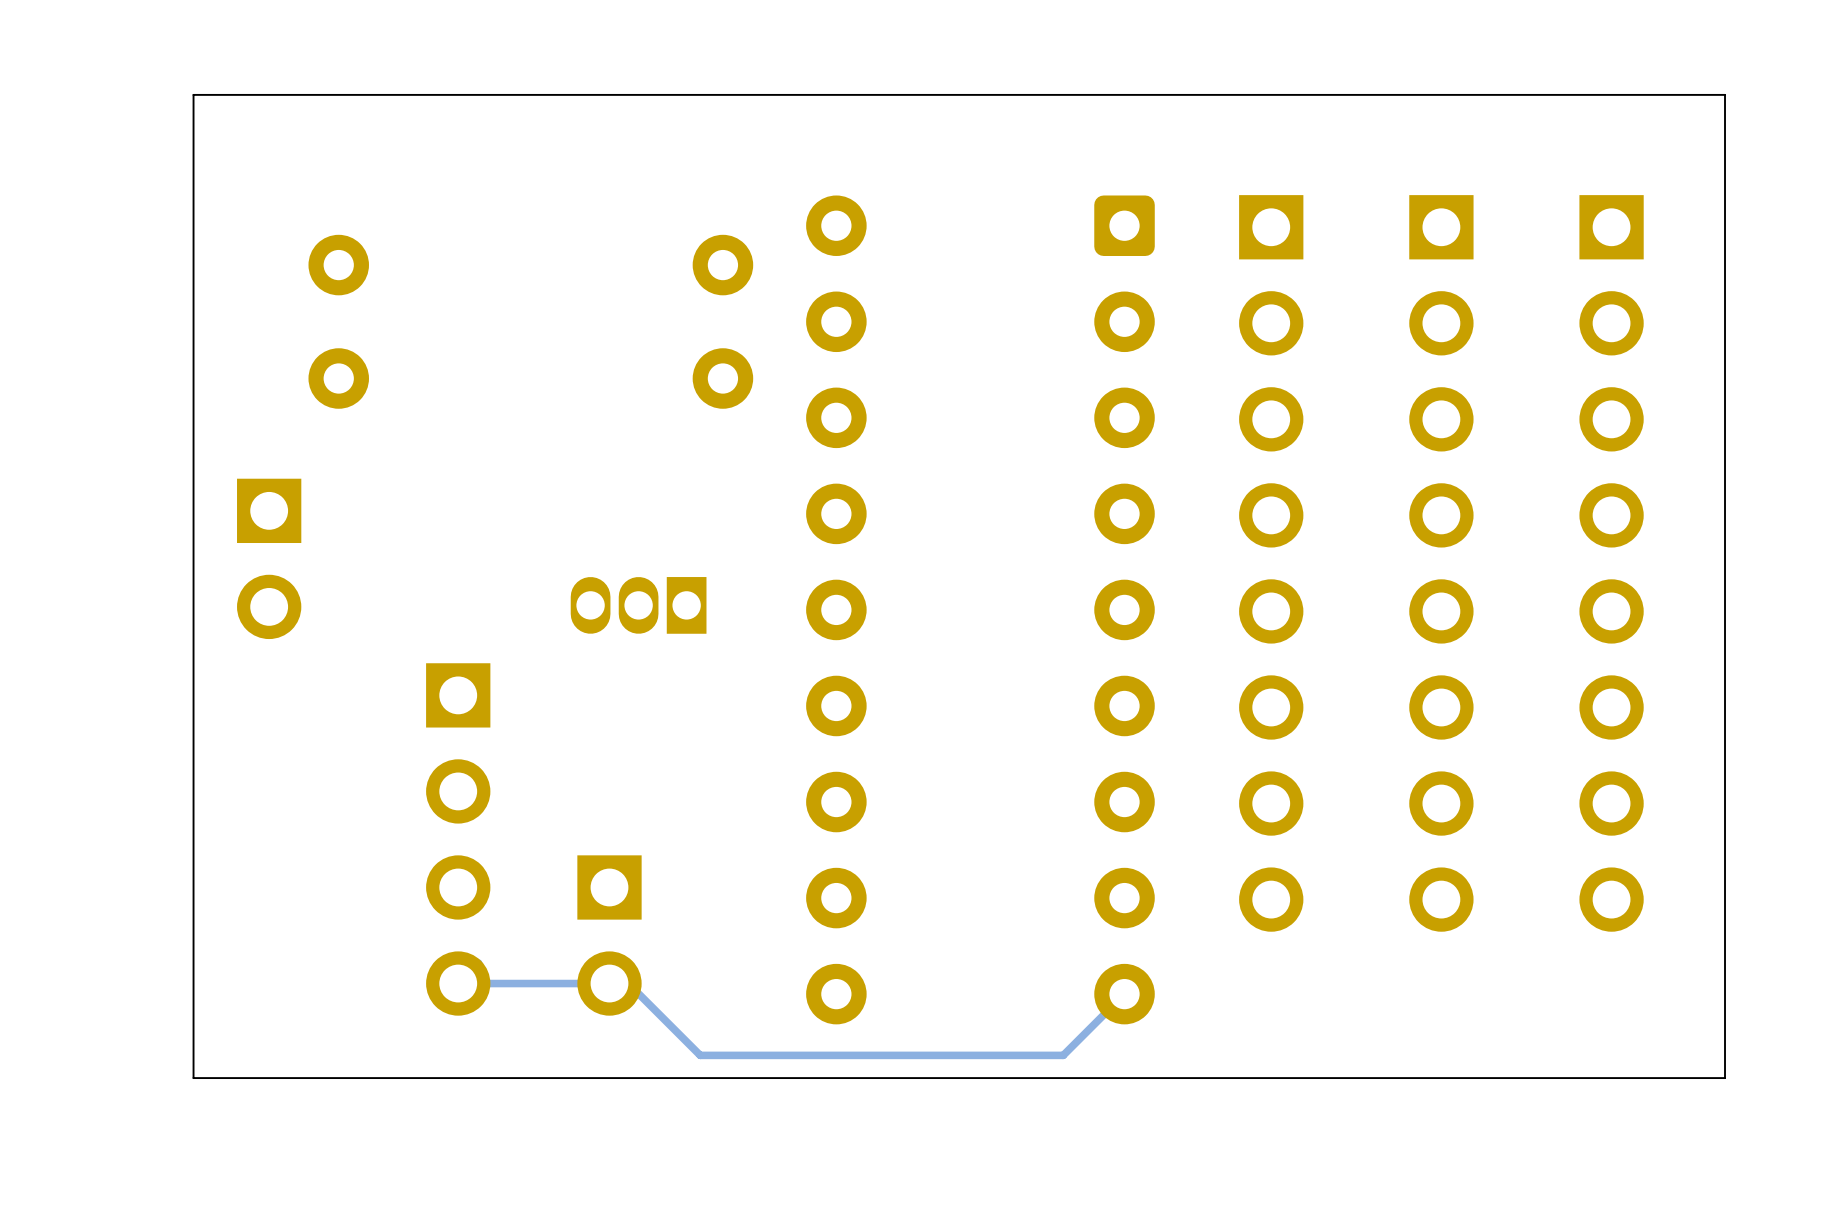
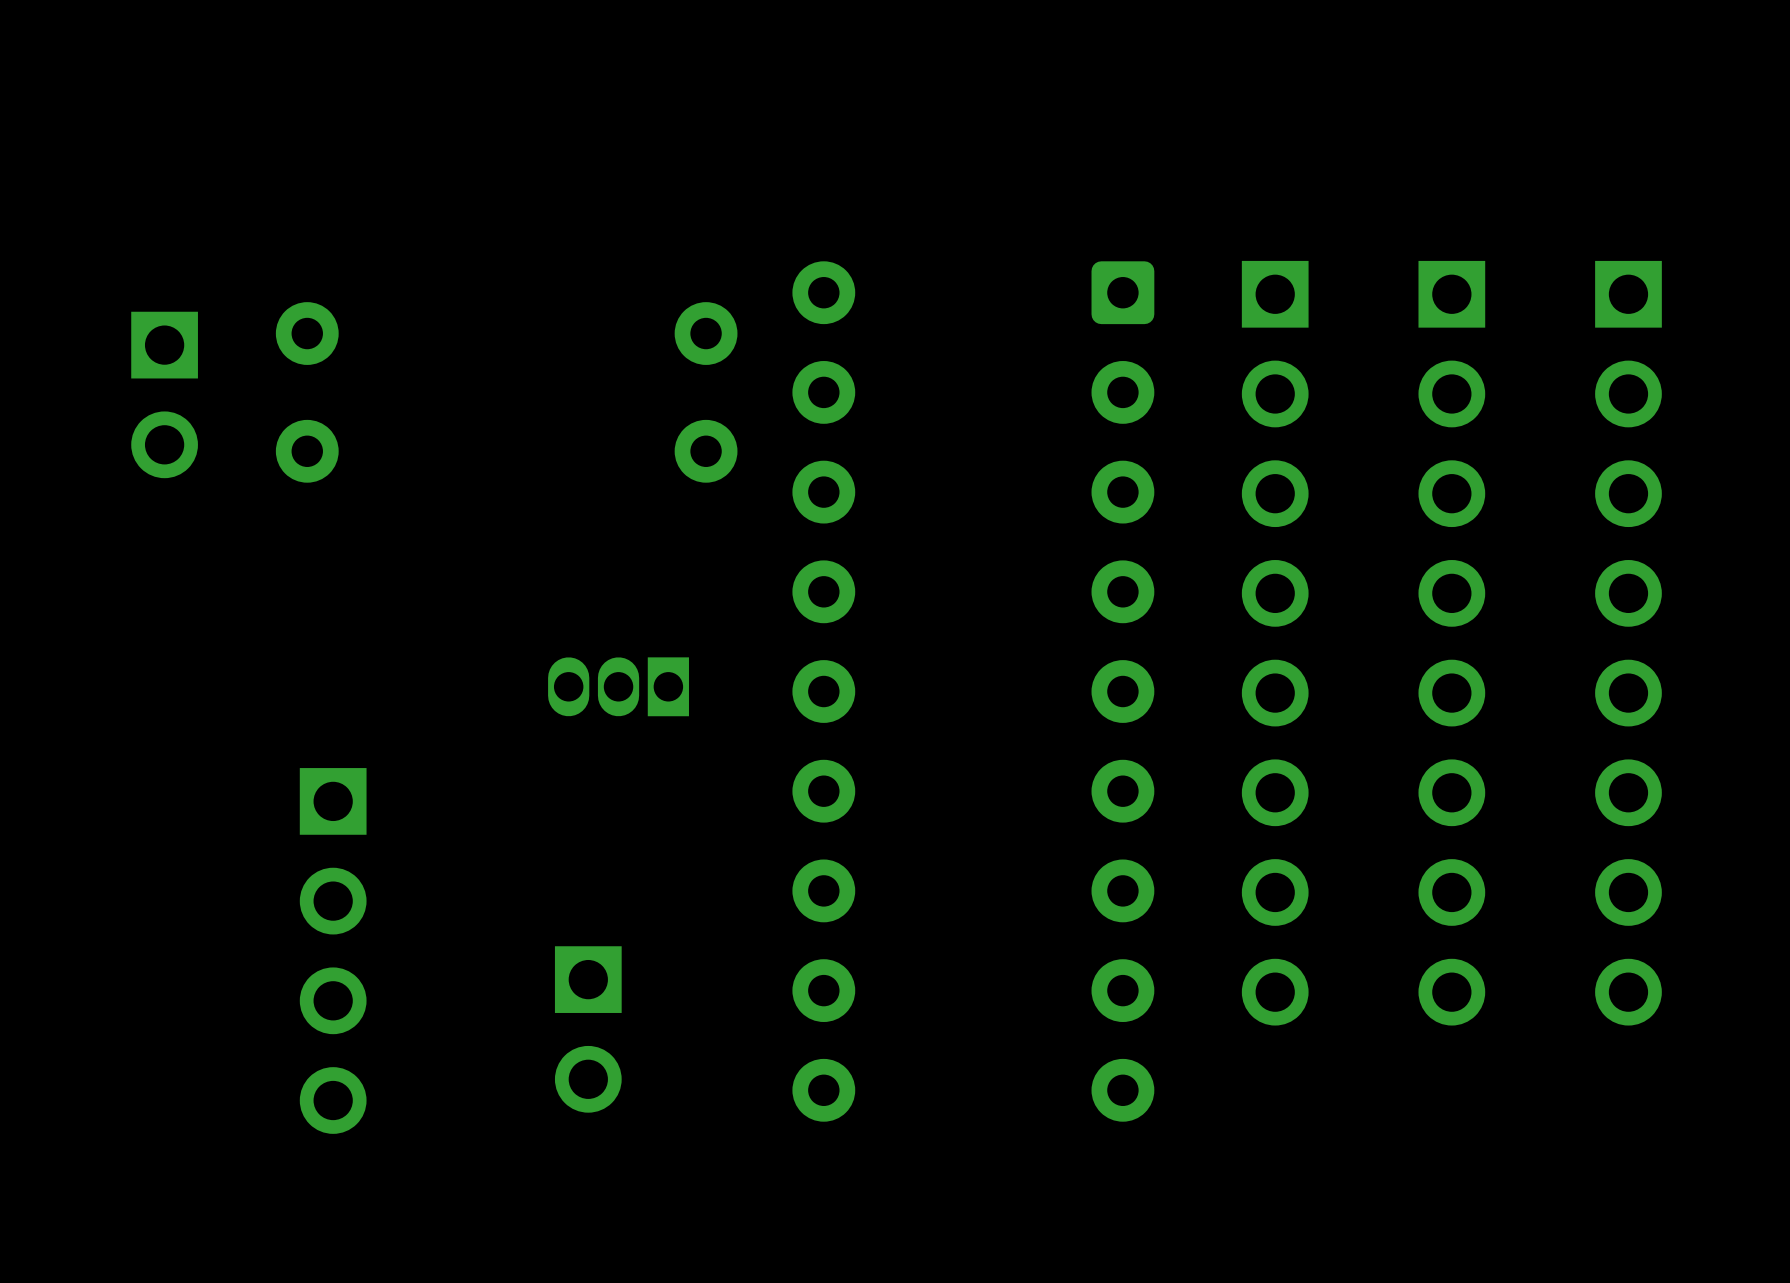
board edge: (1725, 94) (193, 94) (193, 1078) (1725, 1078) (1725, 94) -> none
part position: (269, 558) -> (164, 394)
part position: (458, 839) -> (333, 950)
track: (478, 963) (458, 983) (628, 983) (700, 1055) (1063, 1055) (1124, 994) -> none

